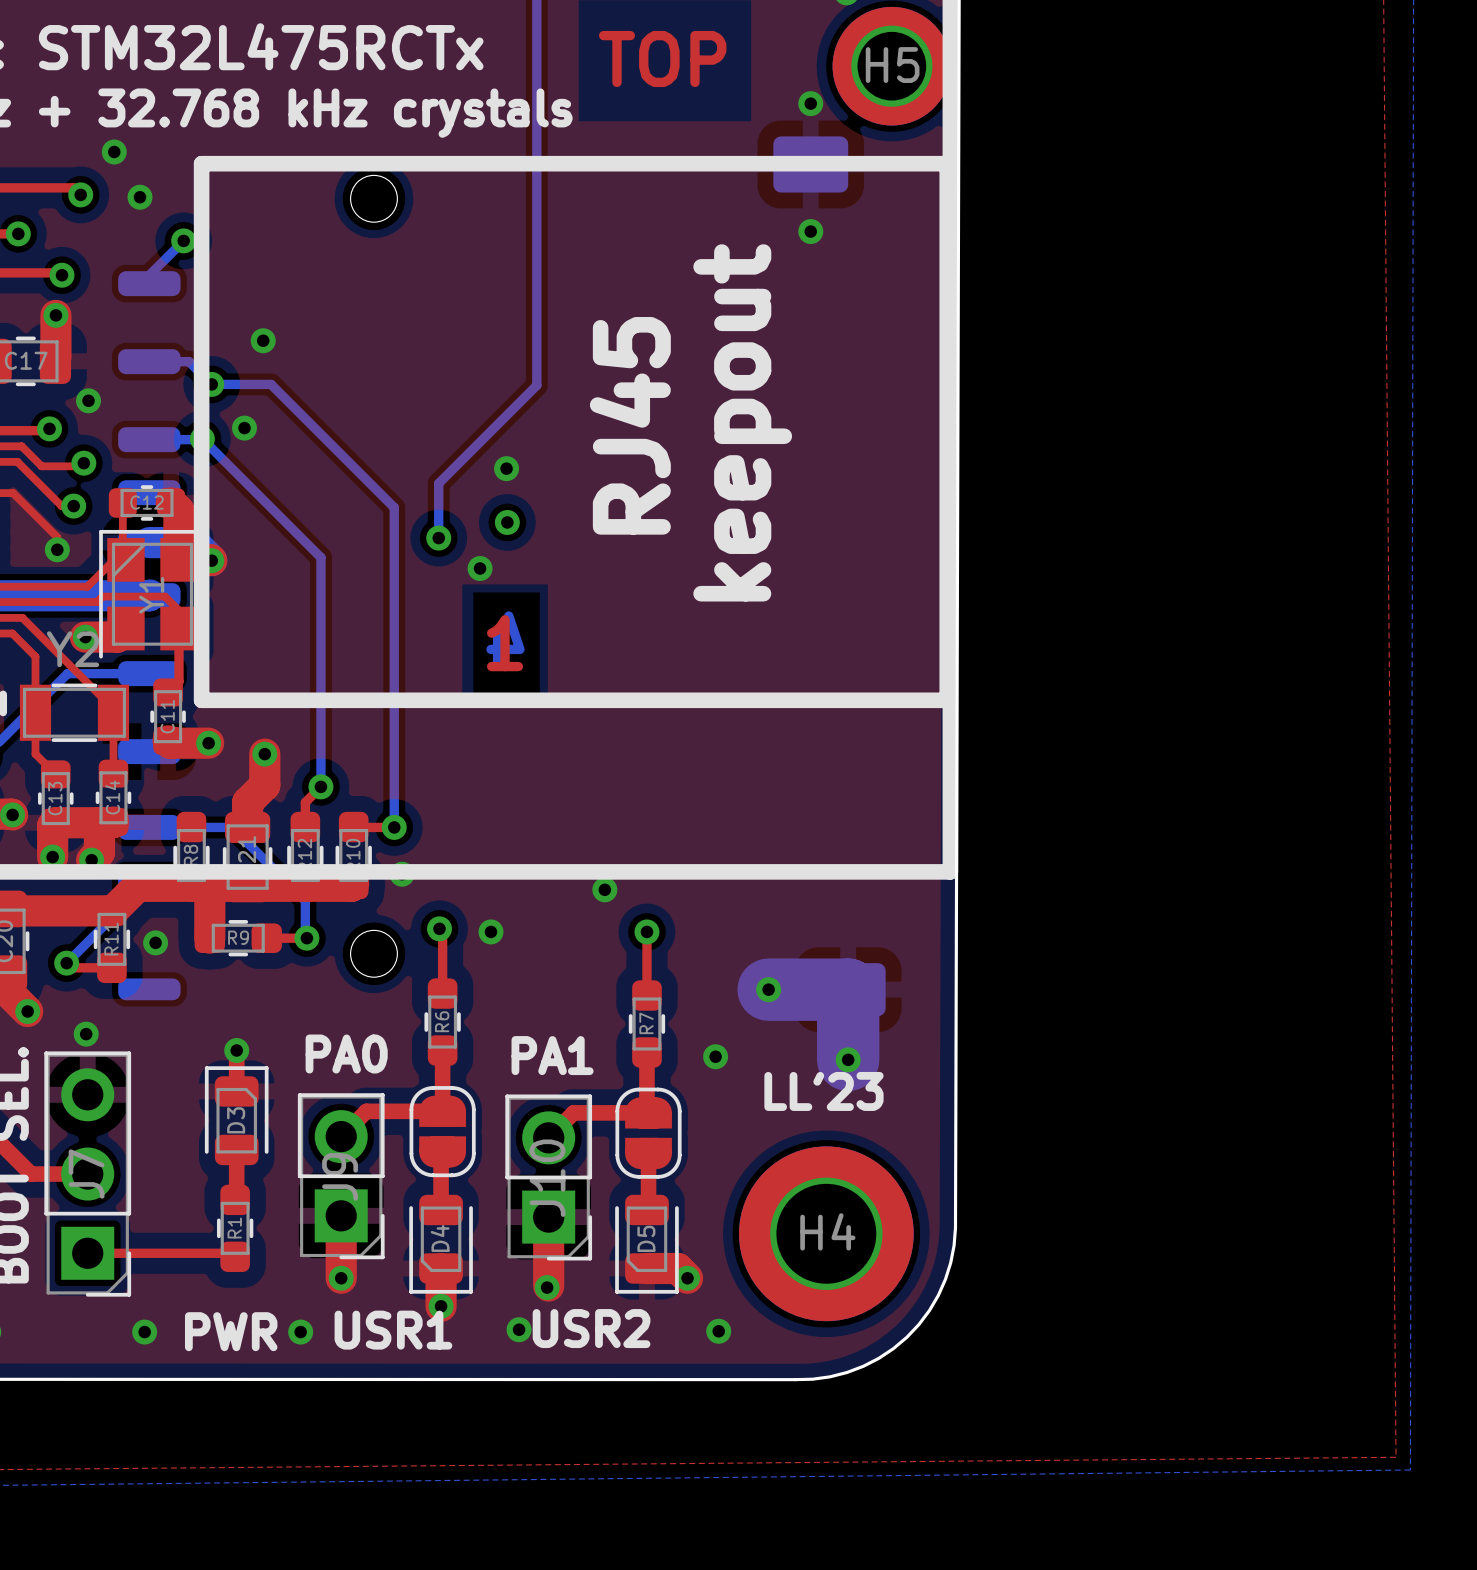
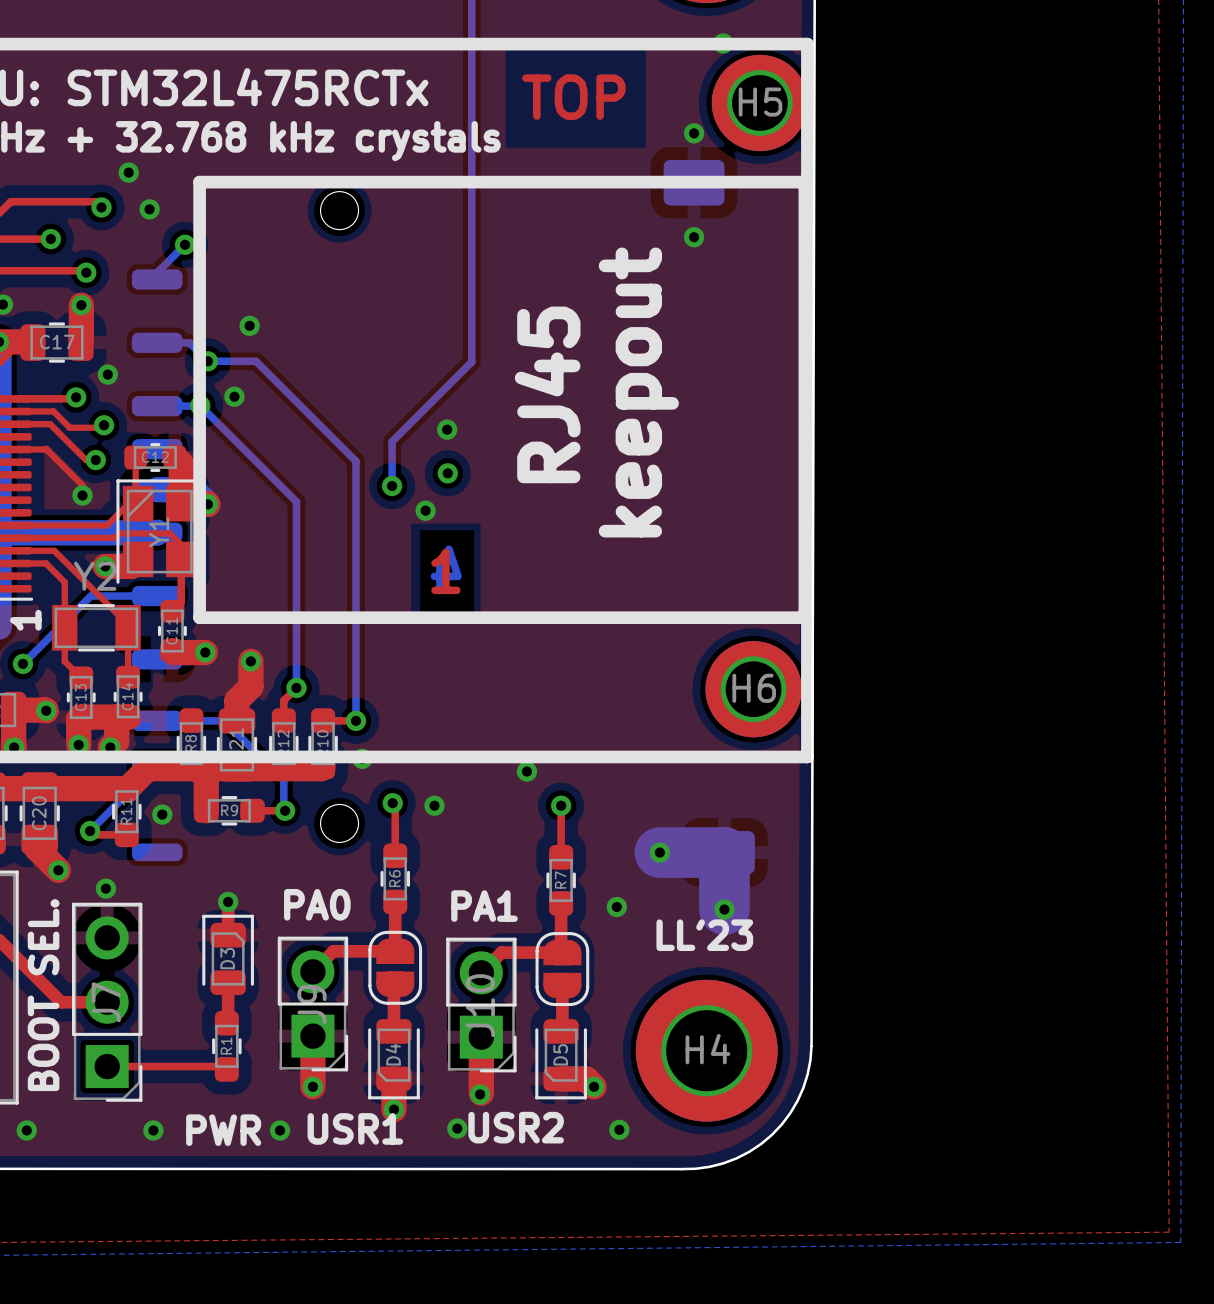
H6: none -> (753, 689)

